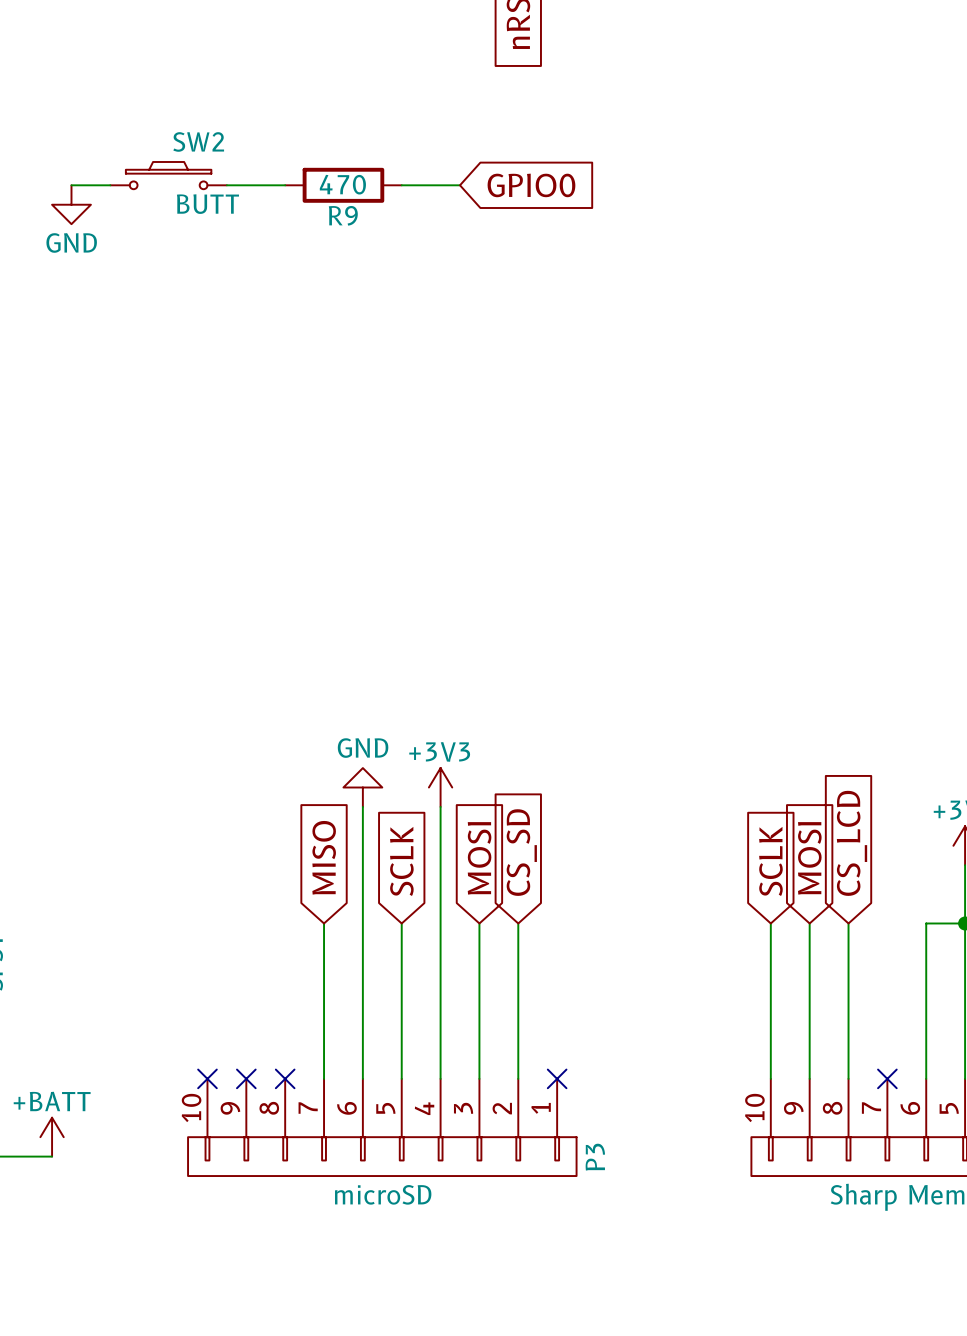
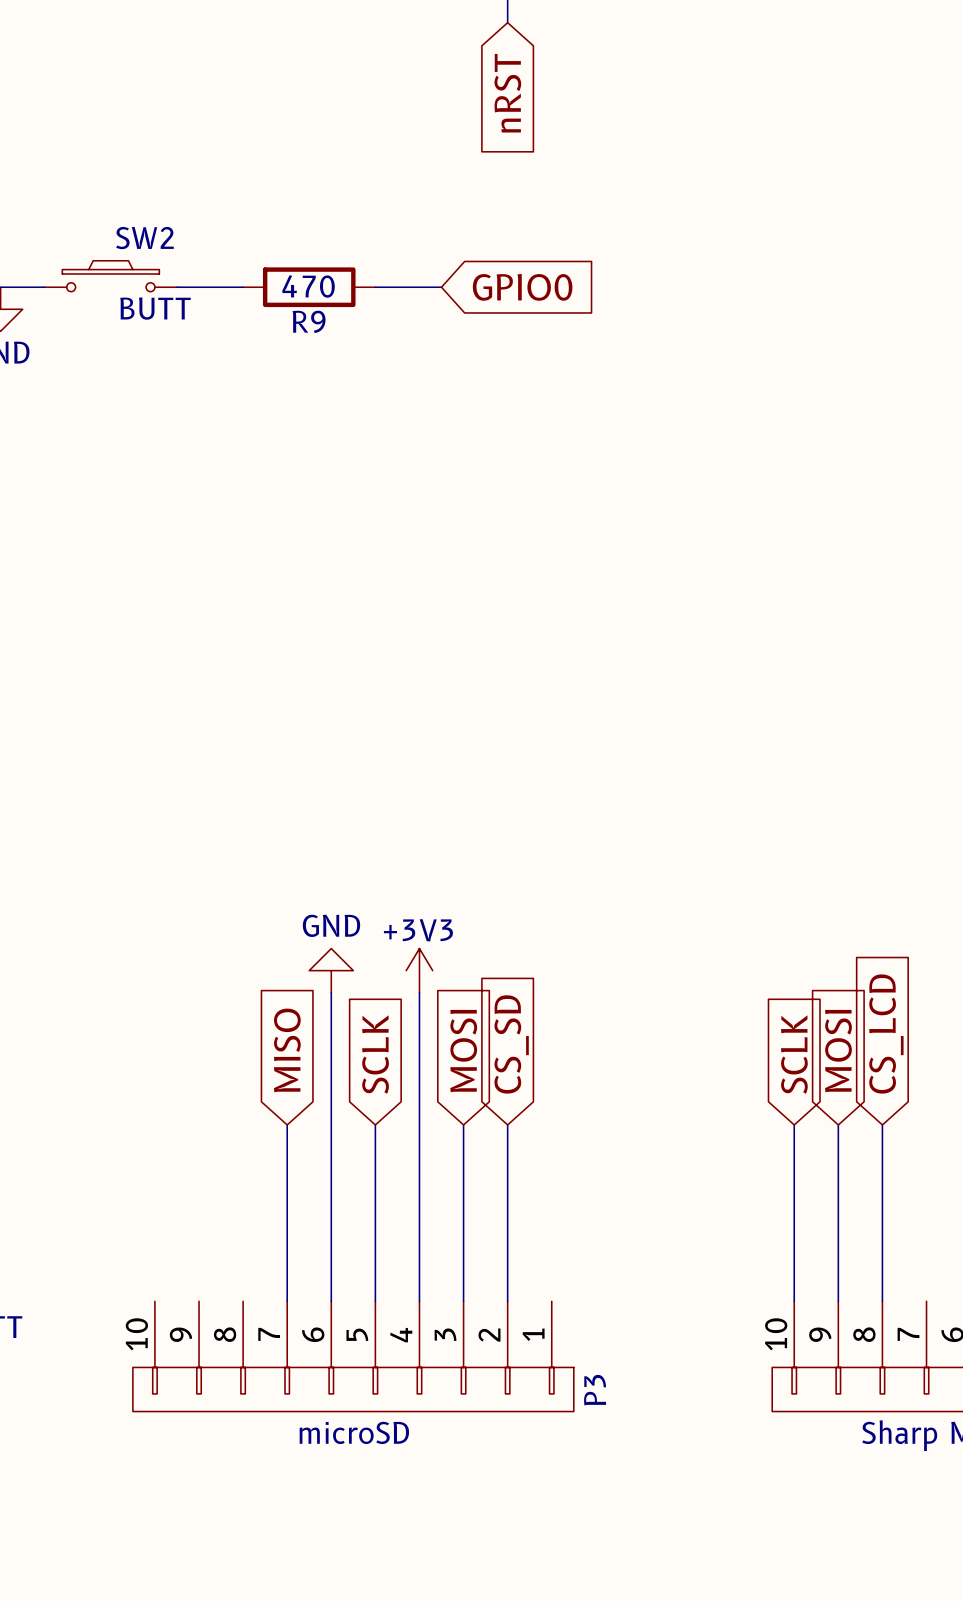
no-connect mark: (207, 1078) -> none
no-connect mark: (246, 1078) -> none
no-connect mark: (285, 1078) -> none
no-connect mark: (557, 1078) -> none
no-connect mark: (887, 1078) -> none

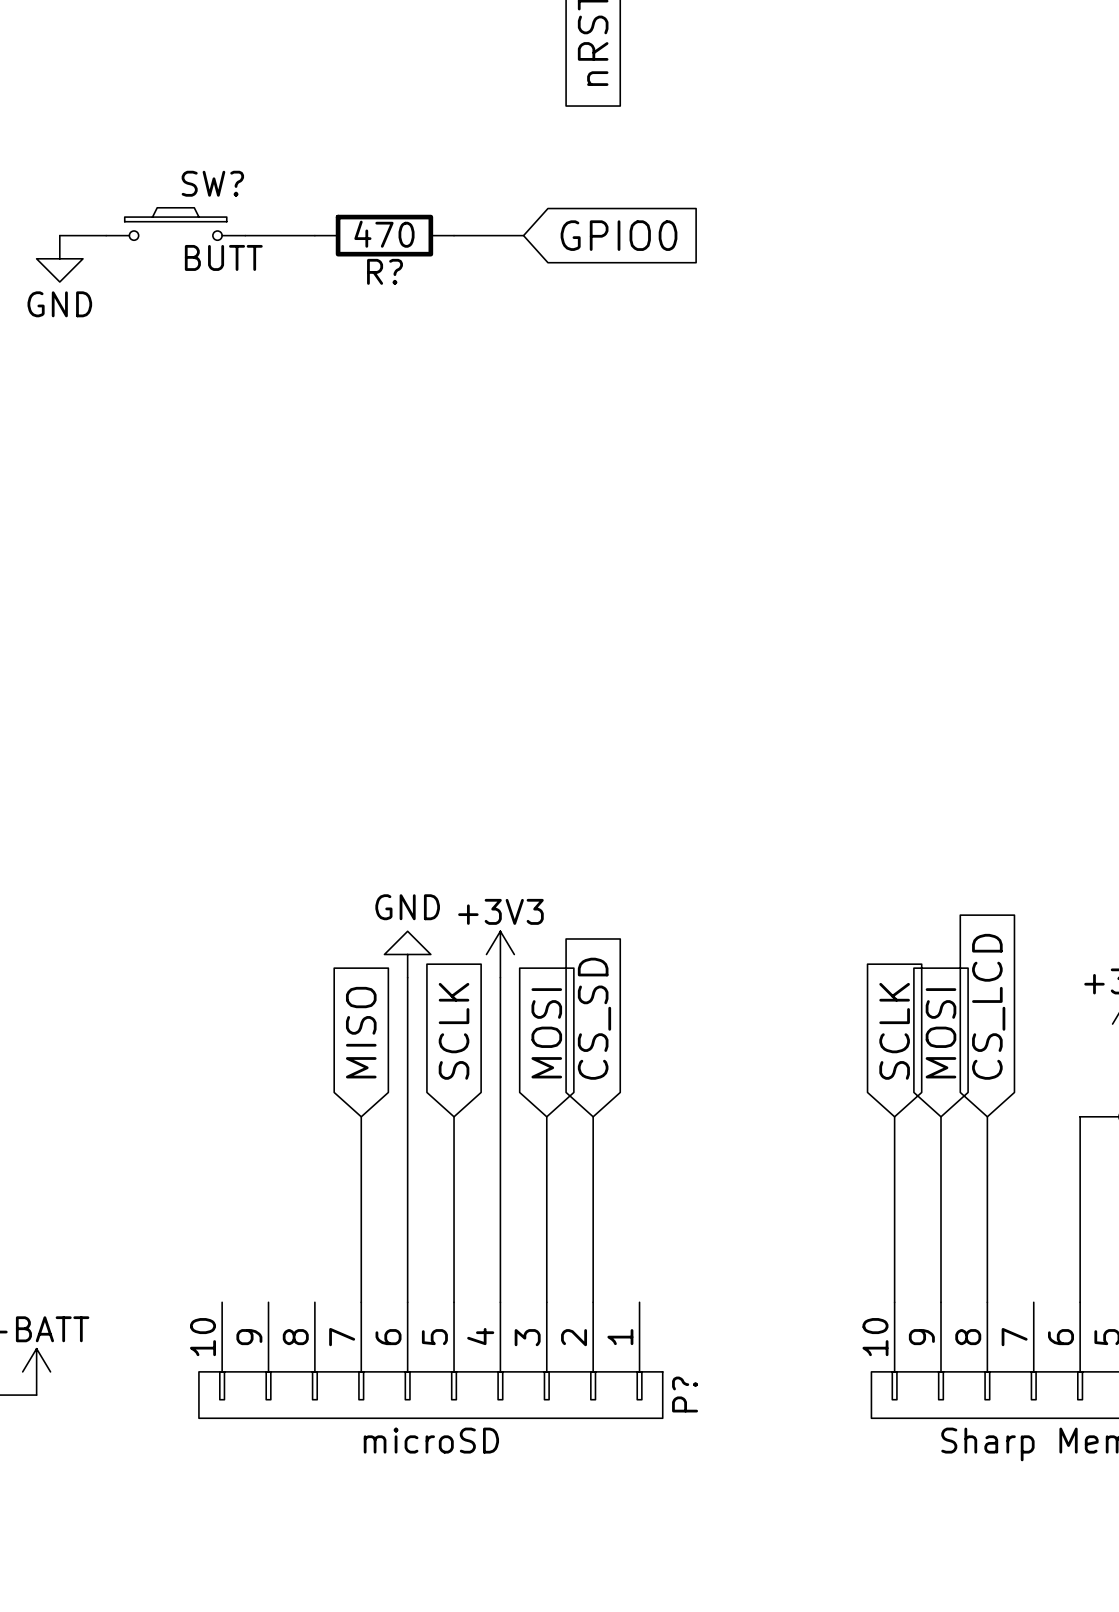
SW2 name: SW2 (144, 238) -> SW? (212, 183)
R9 name: R9 (309, 321) -> R? (385, 271)
P3 name: P3 (595, 1390) -> P? (685, 1394)

